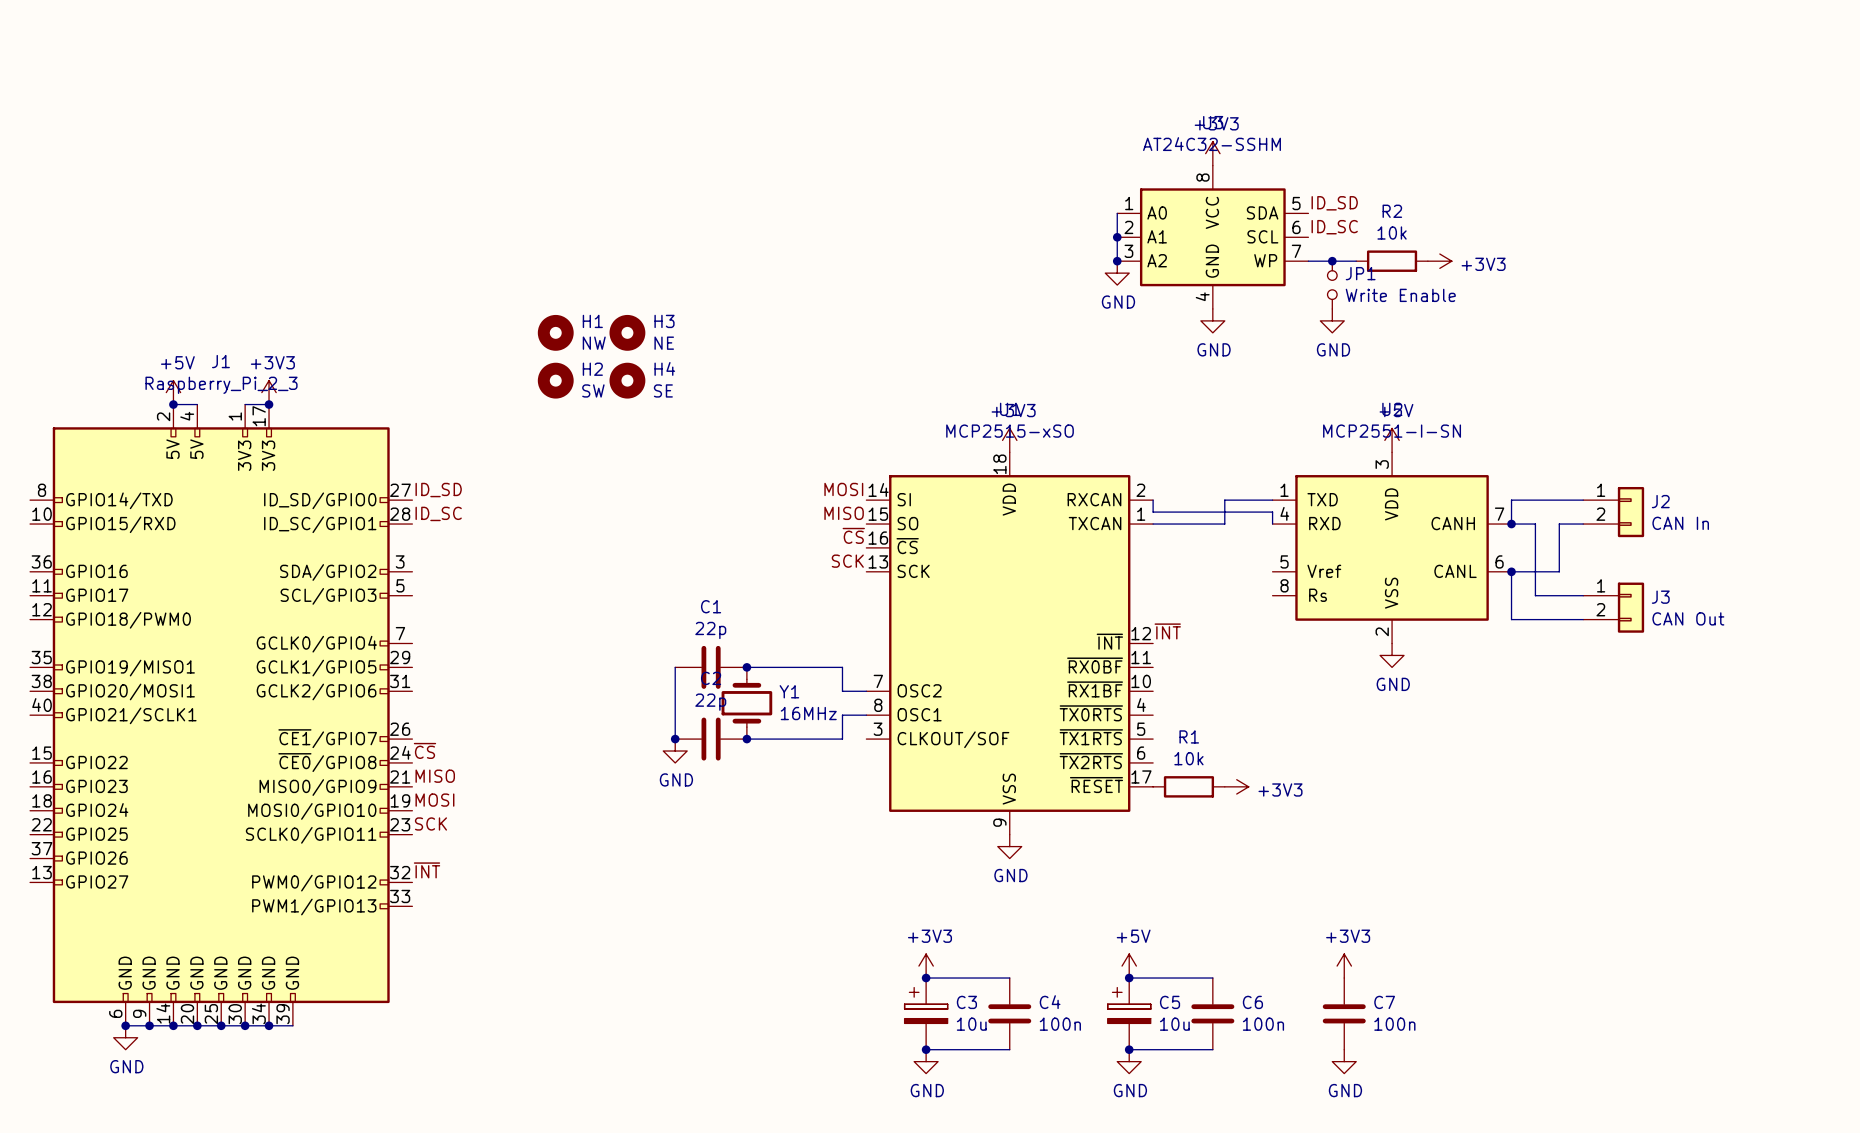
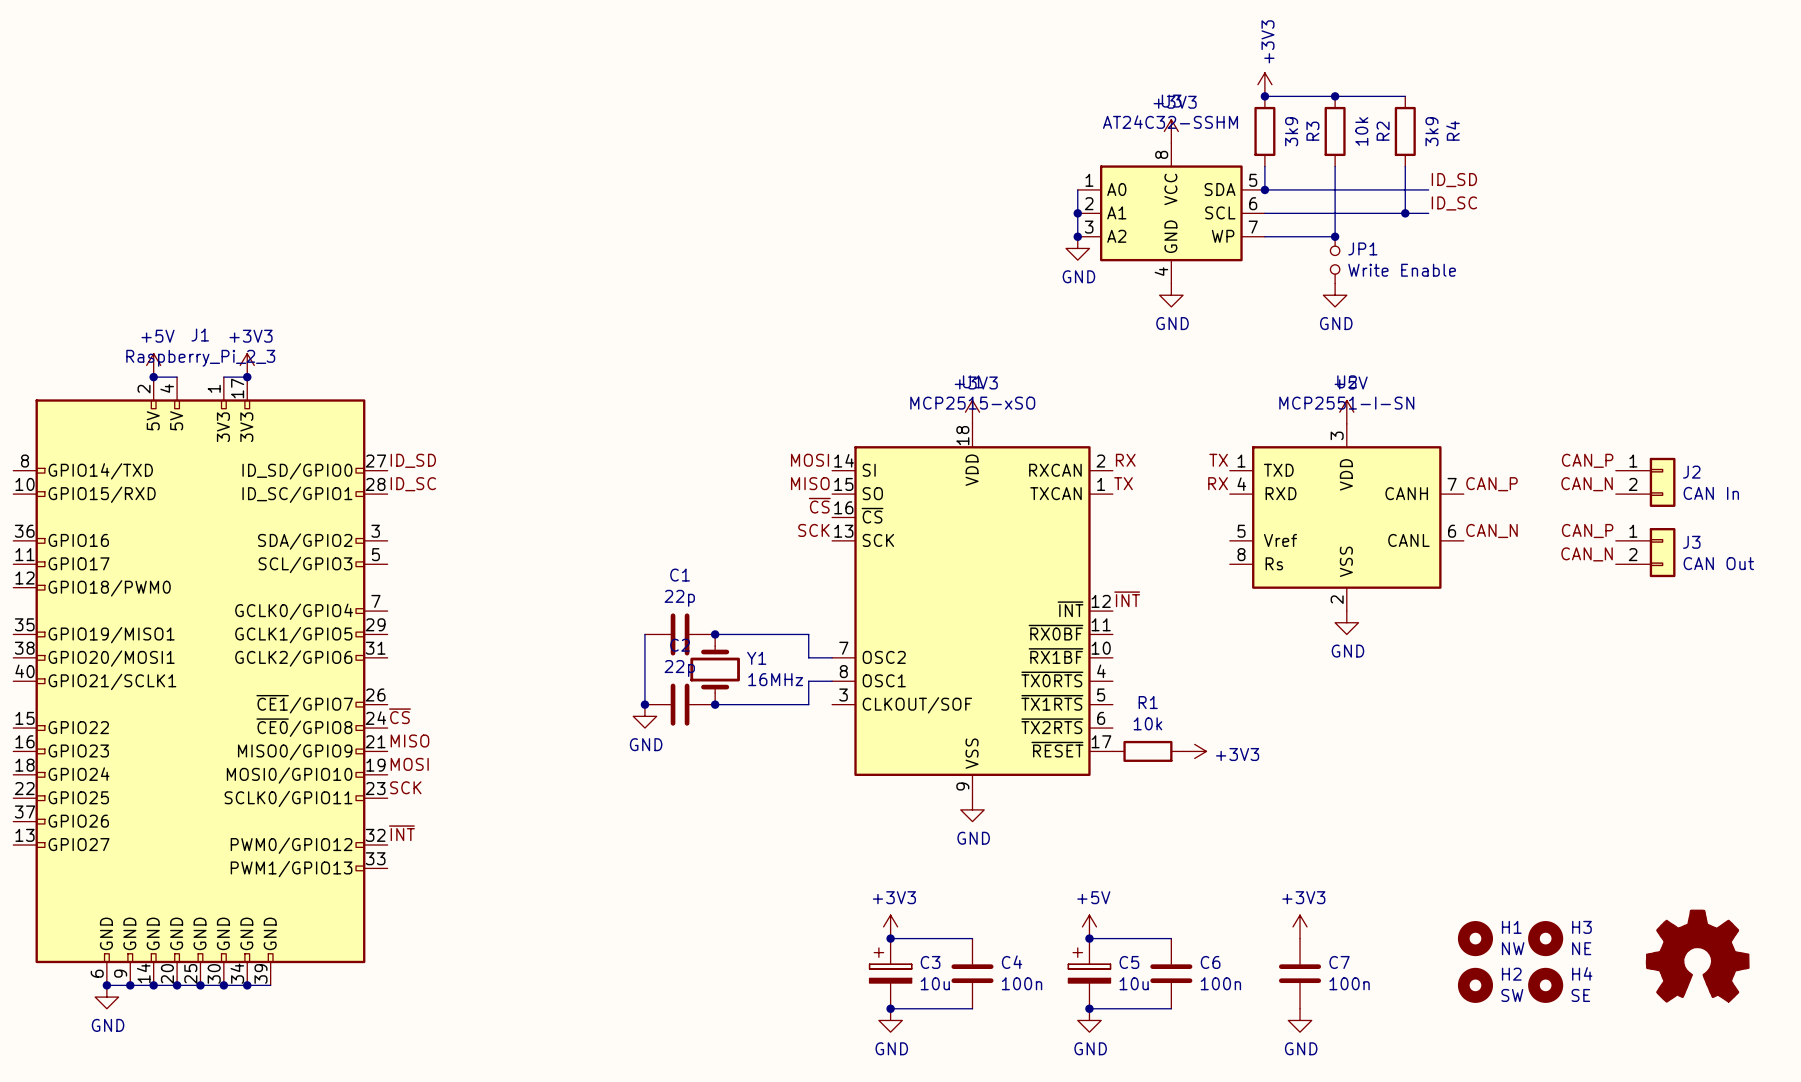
wire: none -> (1264, 96) (1405, 96)
junction: none -> (1264, 96)
junction: none -> (1335, 96)
R3: none -> 3k9 (1264, 131)
R4: none -> 3k9 (1405, 131)
wire: none -> (1264, 166) (1264, 189) (1428, 189)
wire: none -> (1335, 166) (1335, 236) (1311, 236)
wire: none -> (1405, 166) (1405, 213)
label position: ID_SD (1334, 203) -> ID_SD (1454, 180)
junction: none -> (1264, 189)
label position: ID_SC (1334, 227) -> ID_SC (1454, 203)
wire: none -> (1264, 213) (1428, 213)
junction: none -> (1405, 213)
junction: (1332, 261) -> none
junction: none -> (1335, 236)
R2 rotation: 0° (1392, 261) -> 90° clockwise (1335, 131)
R2 position: (1392, 261) -> (1335, 131)
power symbol rotation: 0° (1439, 261) -> 90° counterclockwise (1264, 84)
power symbol position: +3V3 (1439, 261) -> +3V3 (1264, 84)
JP1 position: (1332, 285) -> (1335, 260)
power symbol position: GND (1332, 320) -> GND (1335, 295)
H1 position: (555, 332) -> (1475, 938)
H3 position: (627, 332) -> (1545, 938)
H2 position: (555, 380) -> (1475, 985)
H4 position: (627, 380) -> (1545, 985)
label: none -> RX (1125, 460)
label: none -> TX (1218, 460)
label: none -> CAN_P (1587, 460)
wire: (1153, 500) (1153, 512) (1272, 512) (1272, 524) -> none
wire: (1272, 500) (1224, 500) (1224, 524) (1153, 524) -> none
wire: (1583, 500) (1511, 500) (1511, 524) (1535, 524) (1535, 595) (1583, 595) -> none
J2 position: (1613, 512) -> (1645, 482)
label: none -> TX (1123, 483)
label: none -> RX (1218, 483)
label: none -> CAN_P (1491, 484)
label: none -> CAN_N (1587, 484)
junction: (1511, 524) -> none
wire: (1583, 524) (1559, 524) (1559, 571) (1511, 571) (1511, 619) (1583, 619) -> none
label: none -> CAN_N (1491, 530)
label: none -> CAN_P (1587, 530)
junction: (1511, 571) -> none
label: none -> CAN_N (1587, 554)
J3 position: (1613, 607) -> (1645, 552)
part: none -> (1697, 956)

